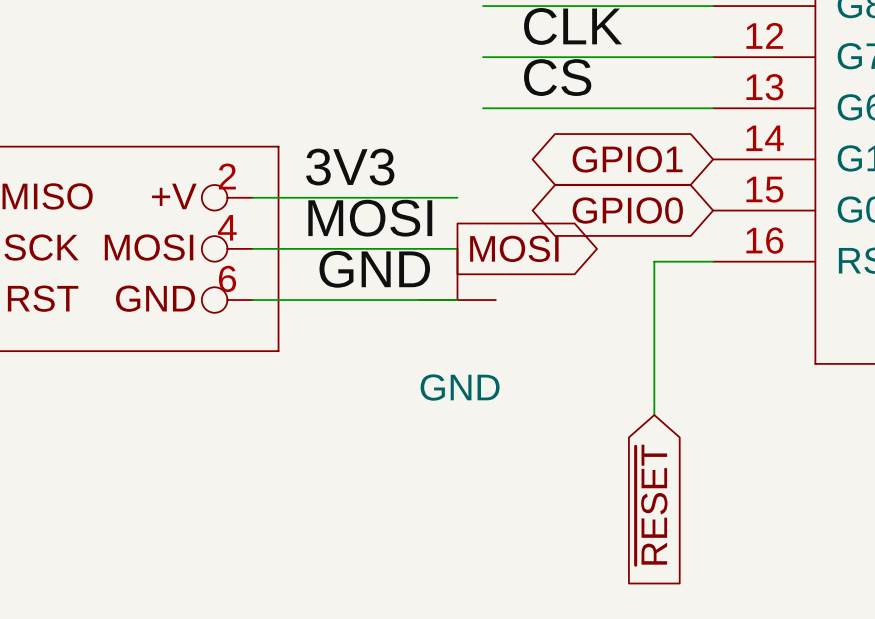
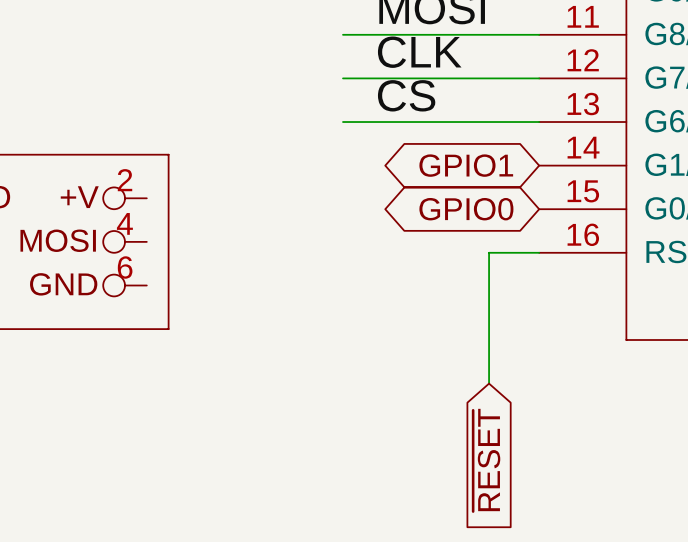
label: 3V3 (350, 167) -> none
wire: (252, 197) (457, 197) -> none
label: MOSI (370, 218) -> none
wire: (252, 248) (457, 248) -> none
global label: MOSI (514, 248) -> none
label: GND (374, 269) -> none
power symbol: GND (457, 274) -> none
wire: (252, 300) (457, 300) -> none

